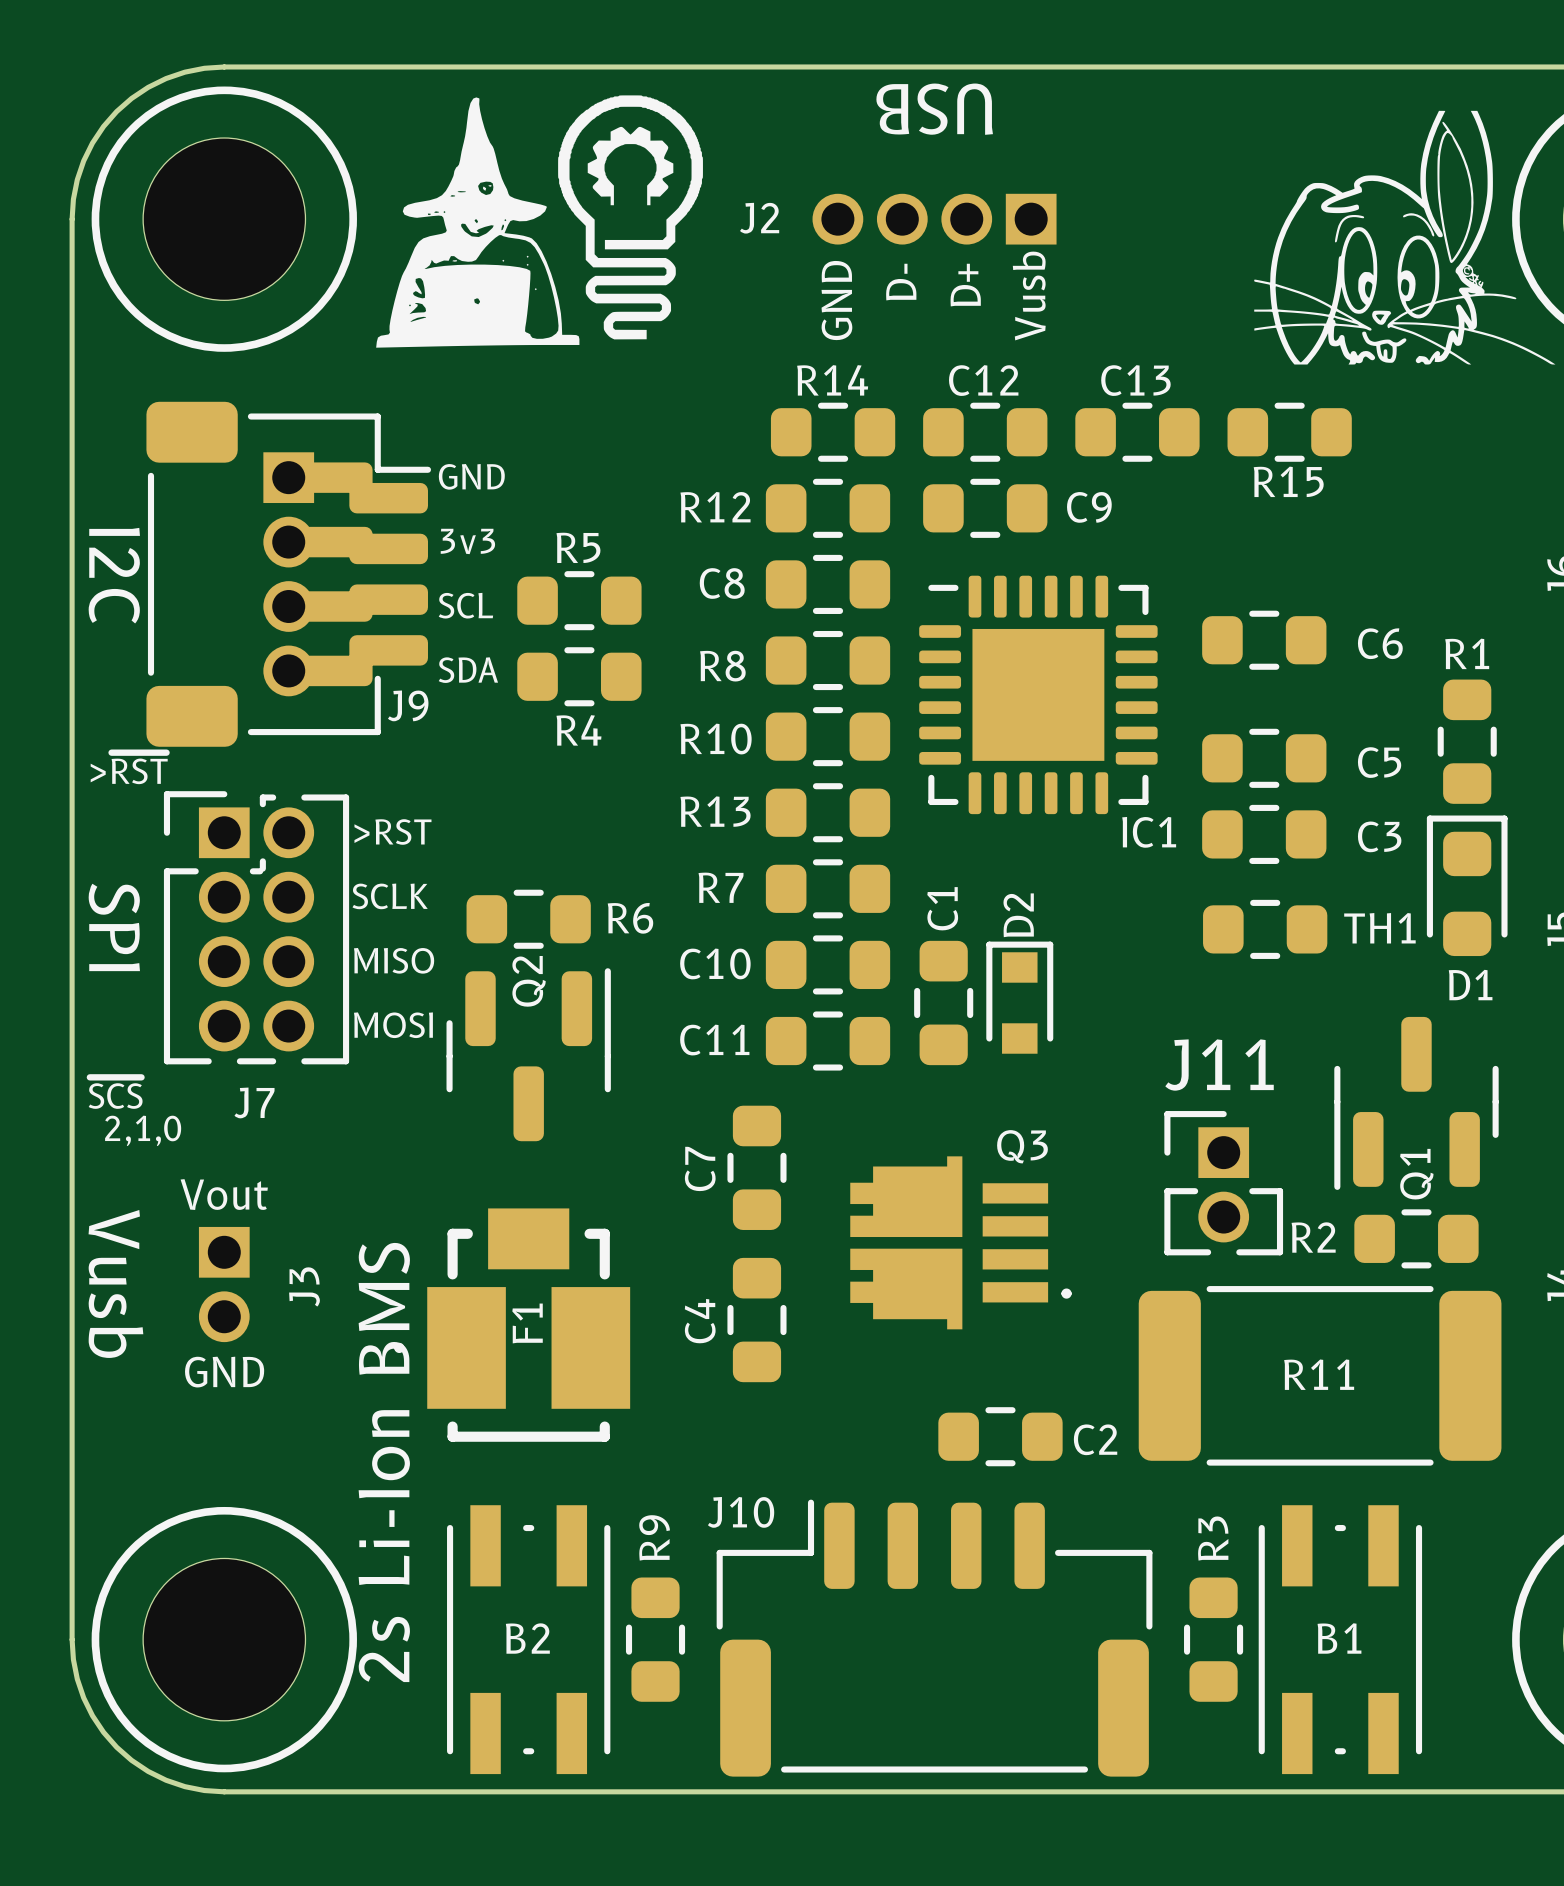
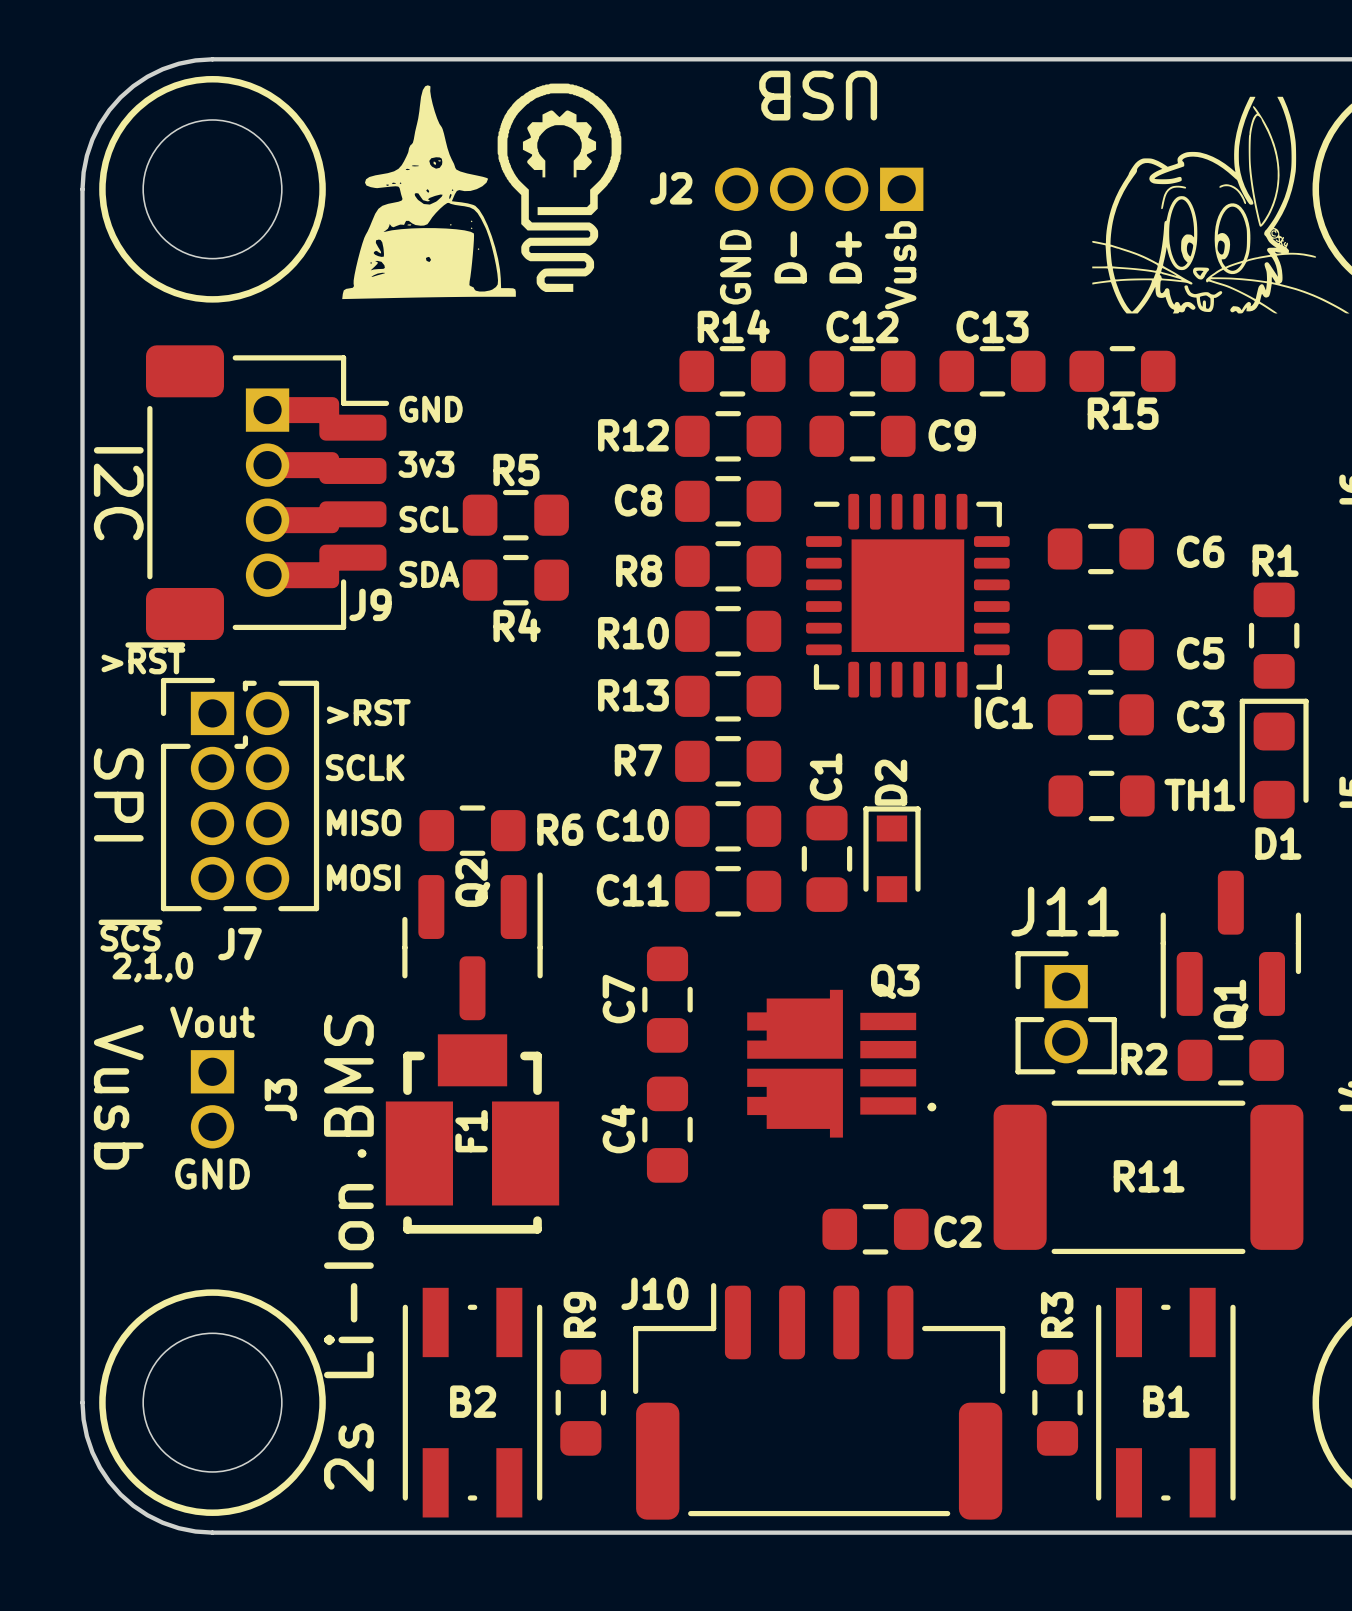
R6 position: (528, 919) -> (472, 830)
Q2 position: (528, 1054) -> (472, 946)

